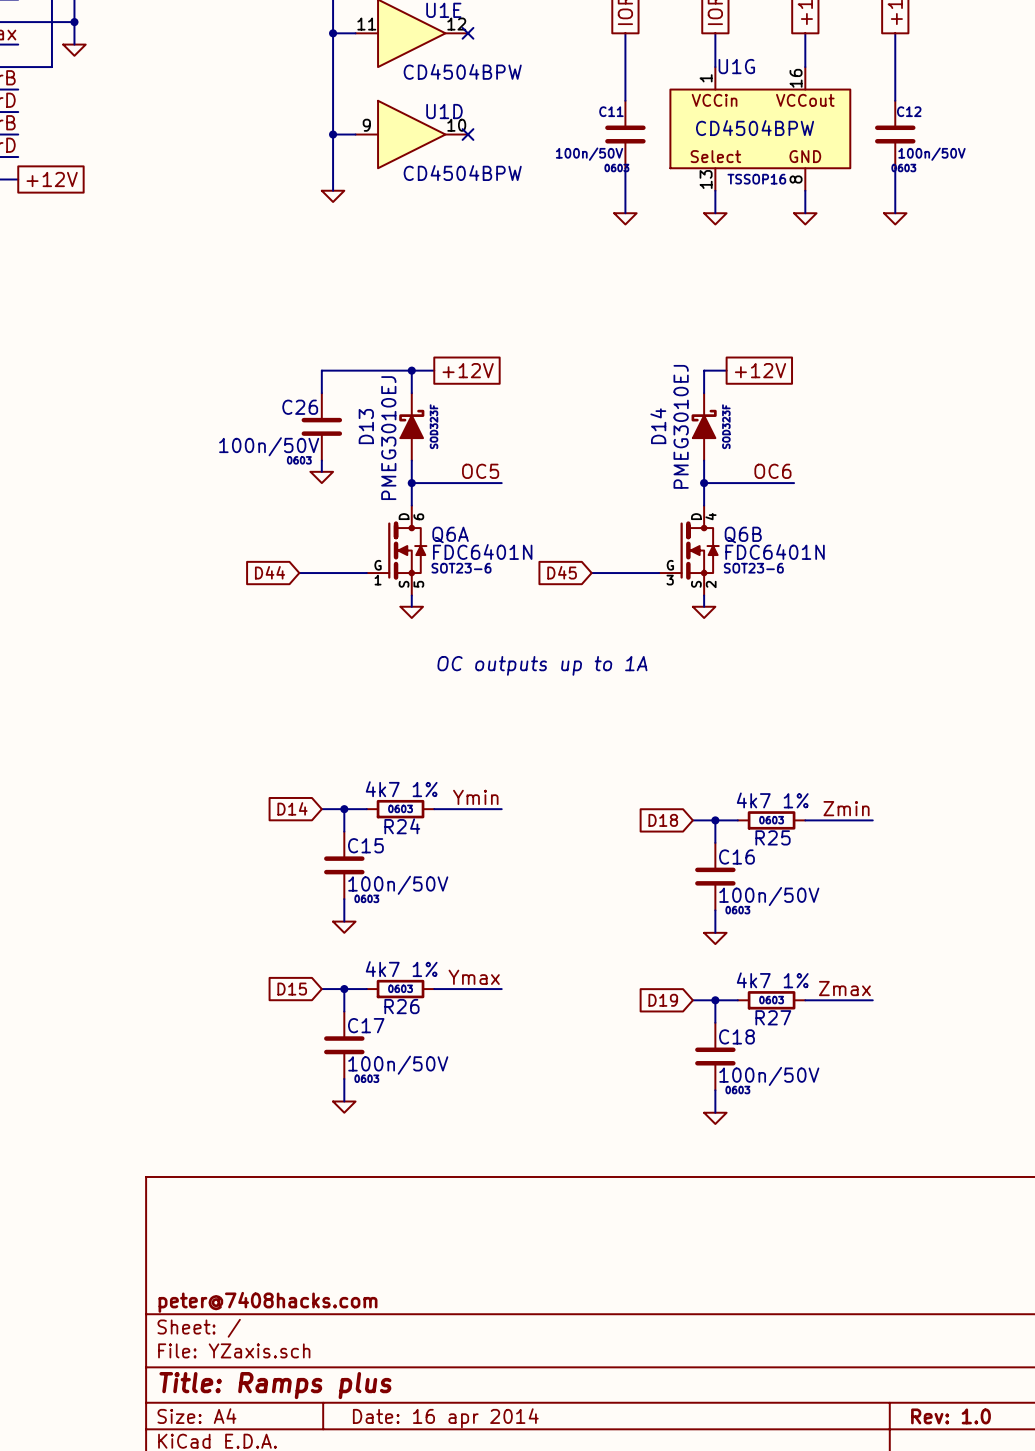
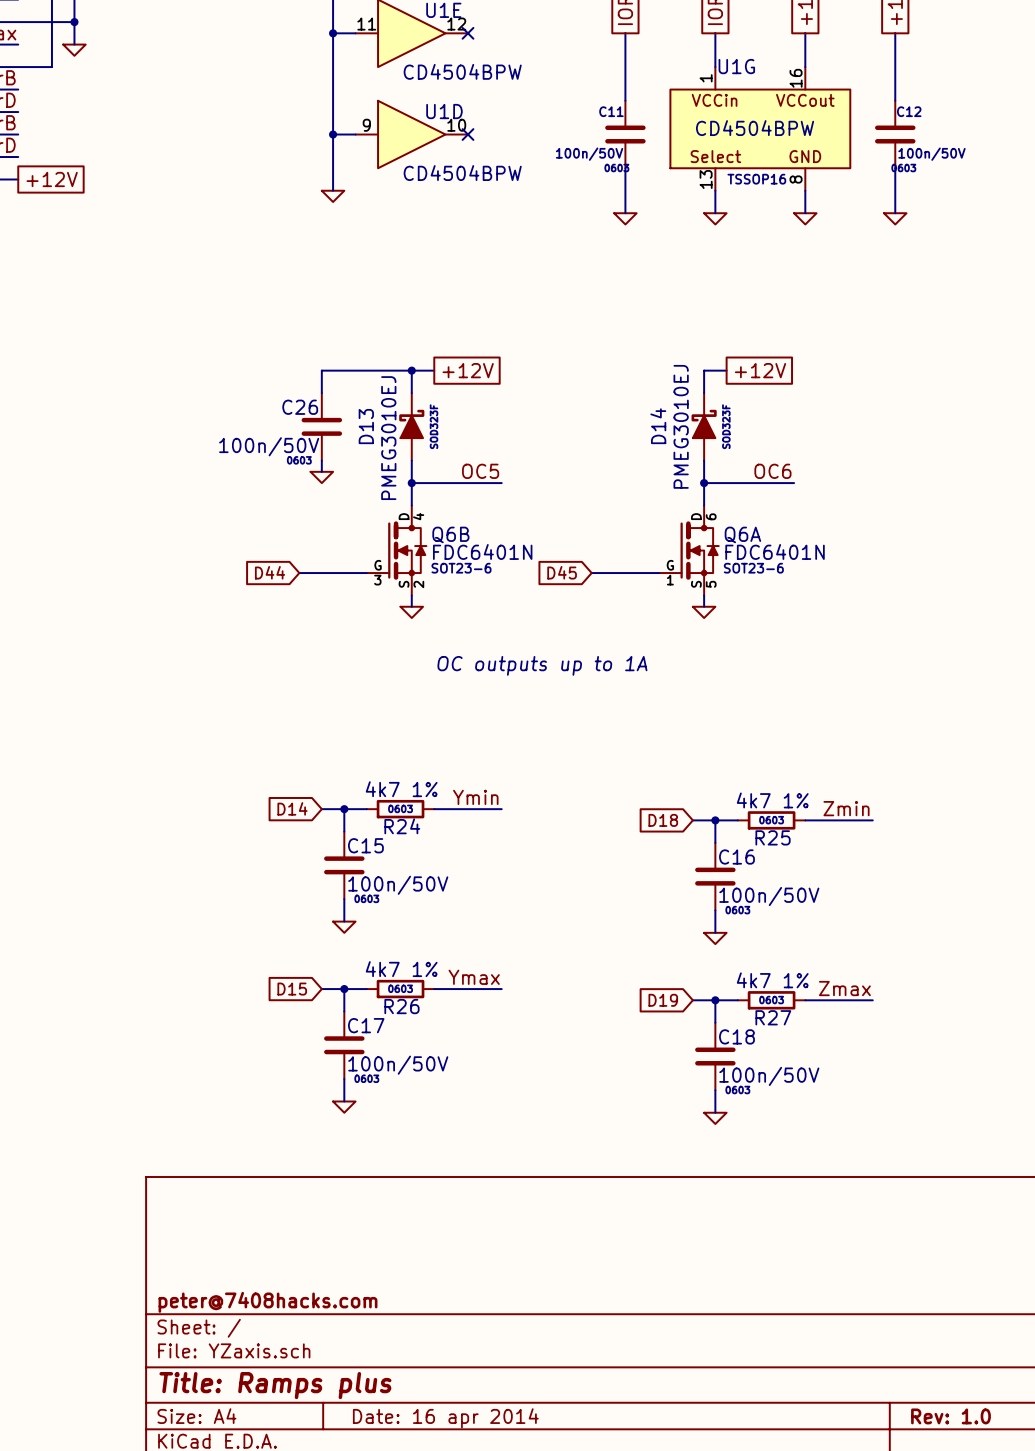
Q6A position: (396, 550) -> (688, 550)
Q6B position: (688, 550) -> (396, 550)

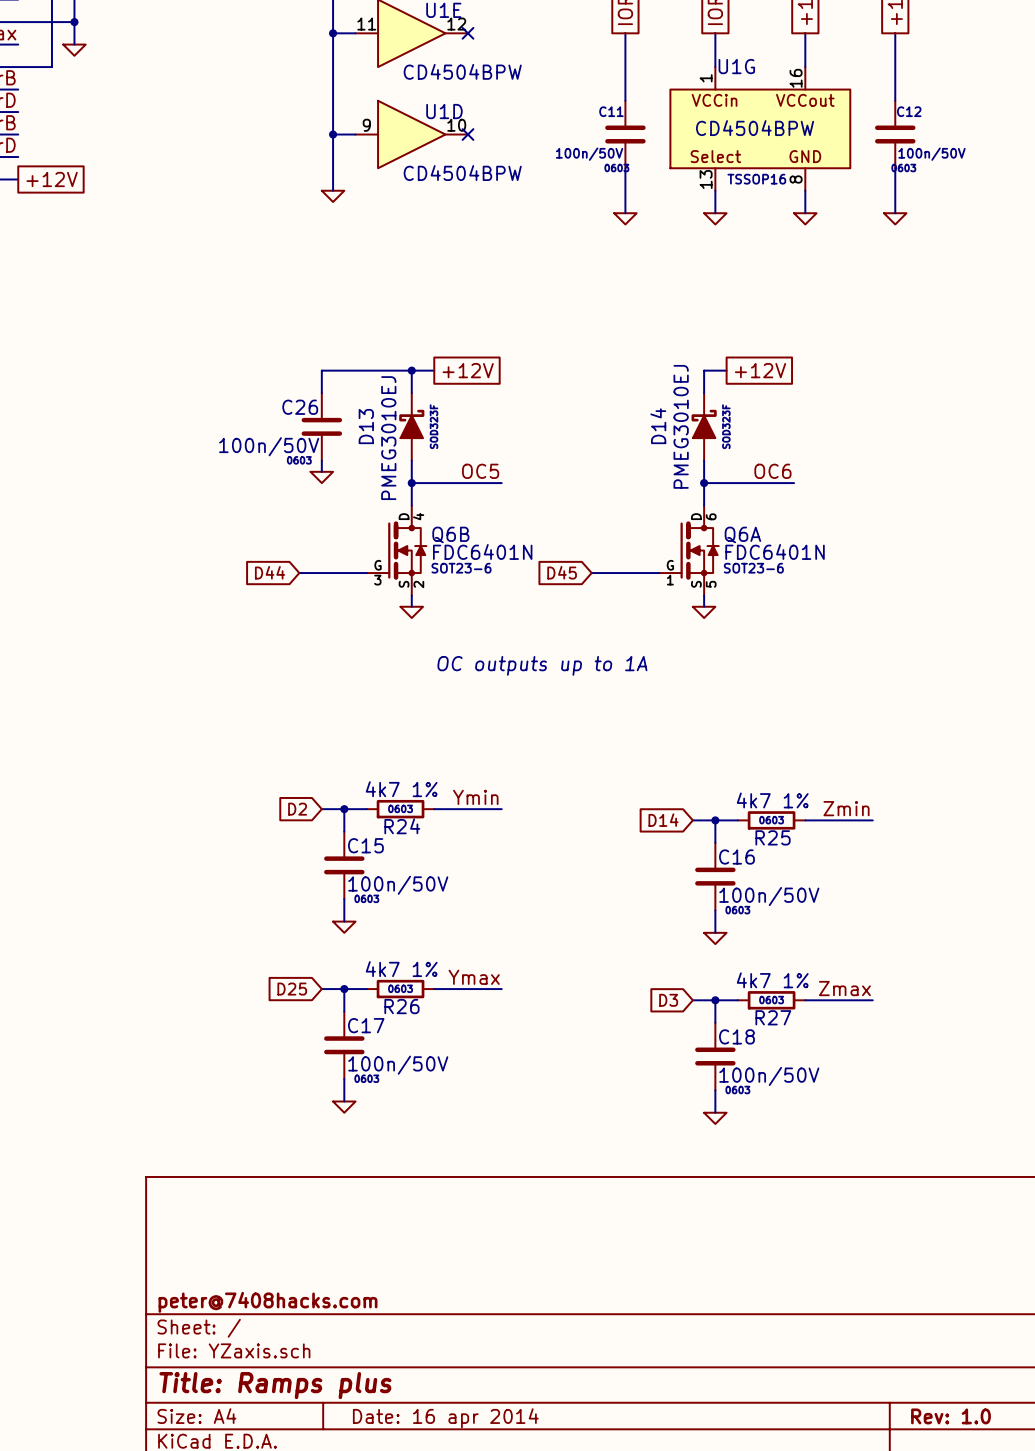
global label: D14 (292, 808) -> D2 (297, 809)
global label: D18 (663, 820) -> D14 (663, 820)
global label: D15 (292, 989) -> D25 (292, 989)
global label: D19 (663, 1000) -> D3 (668, 1000)

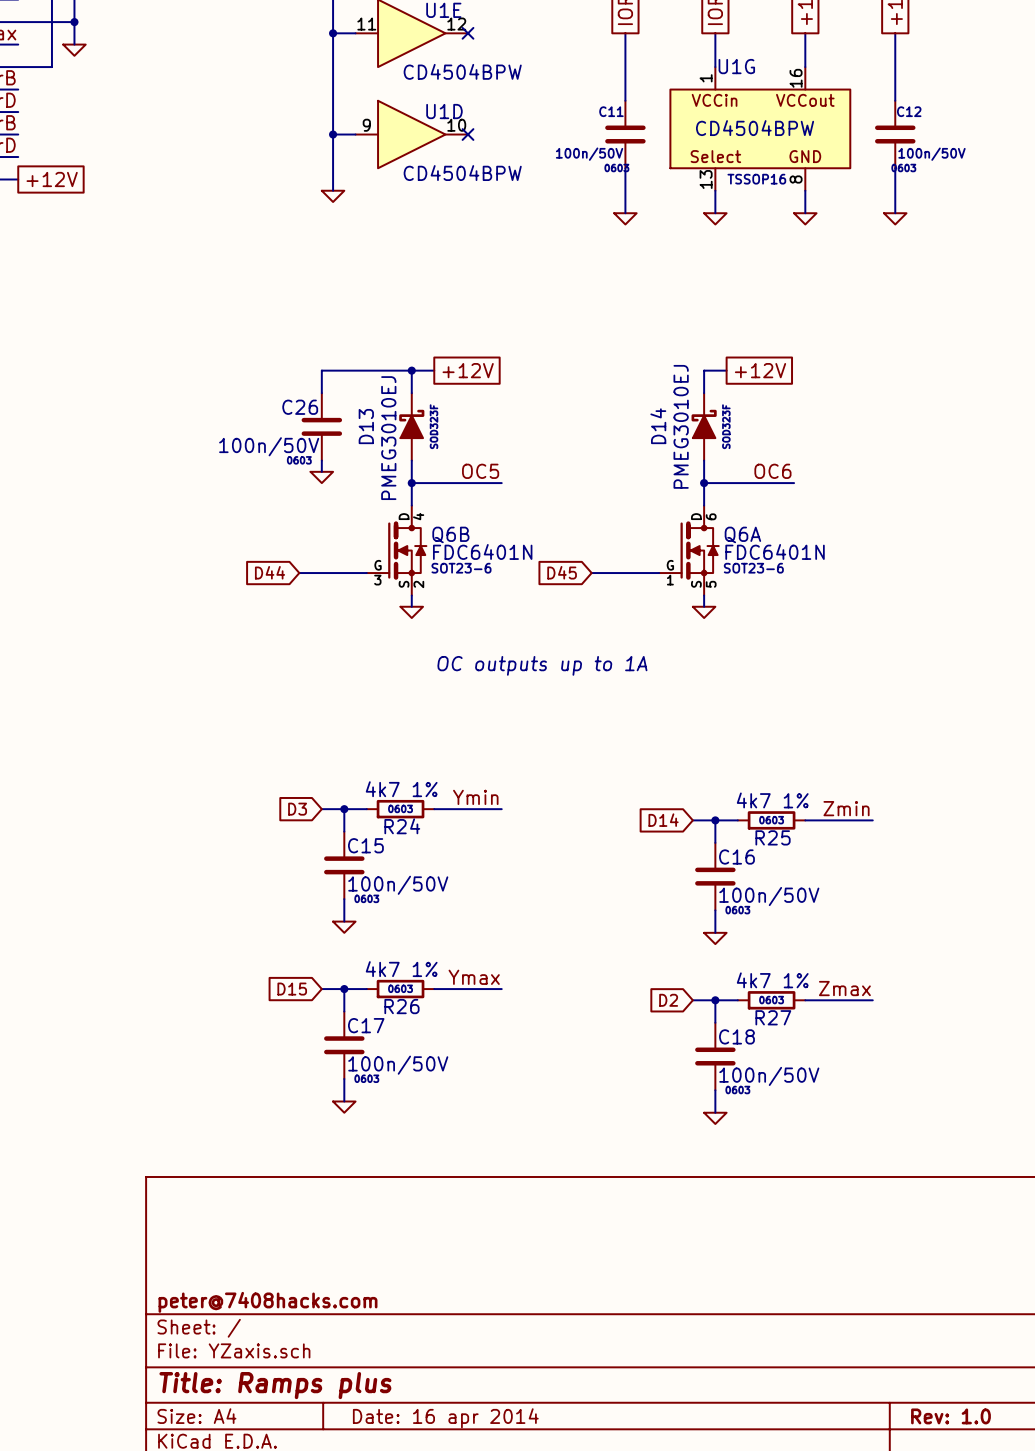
global label: D2 (297, 809) -> D3 (297, 809)
global label: D25 (292, 989) -> D15 (292, 989)
global label: D3 (668, 1000) -> D2 (668, 1000)

